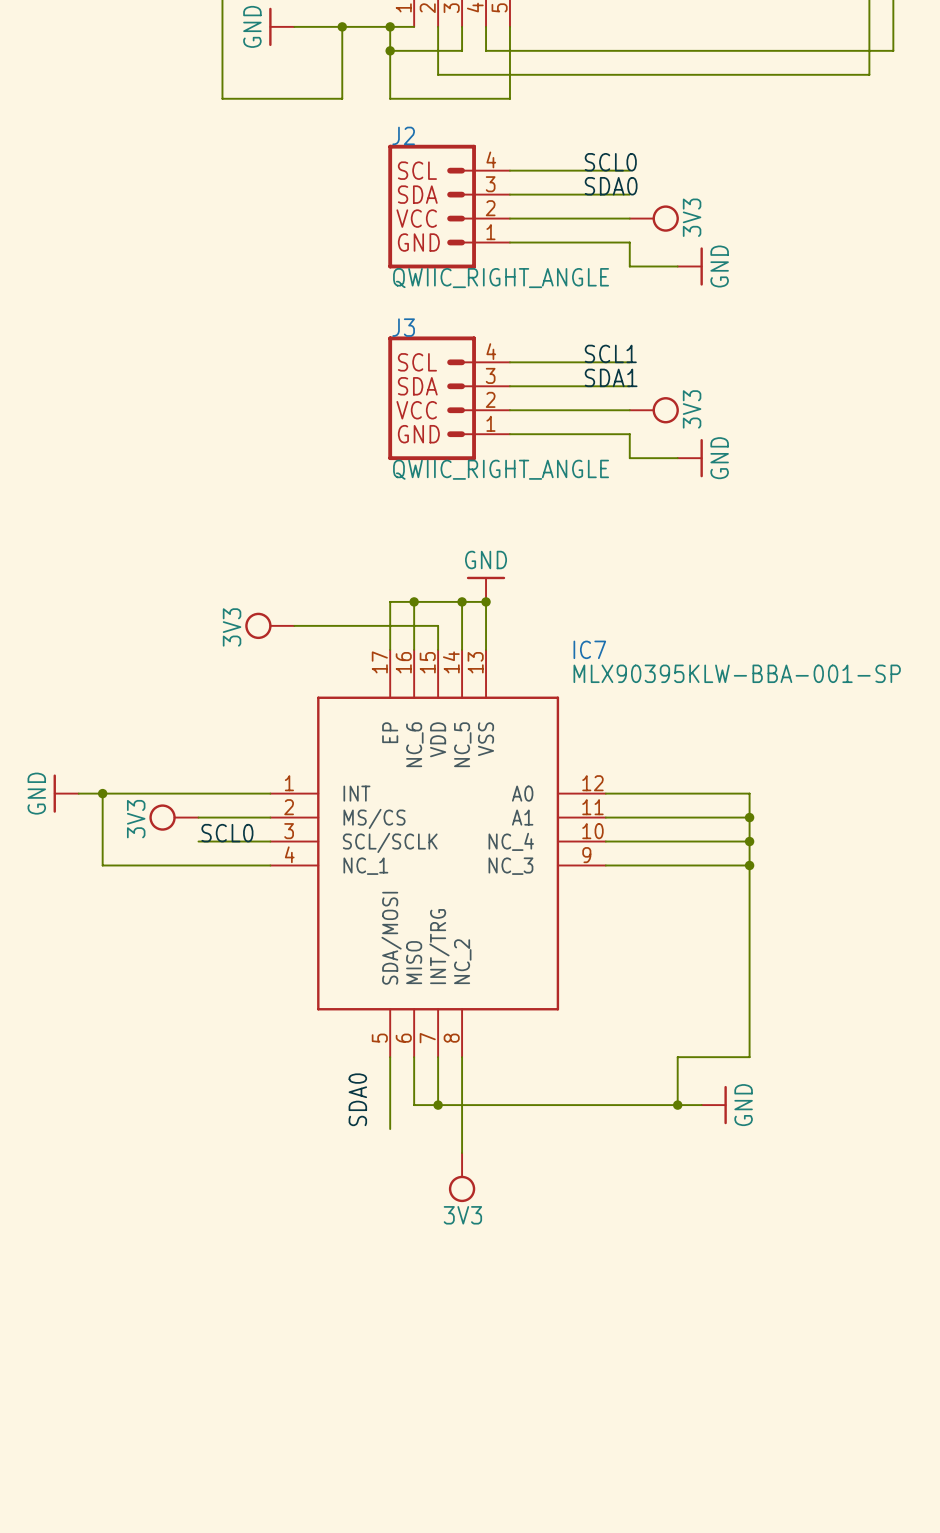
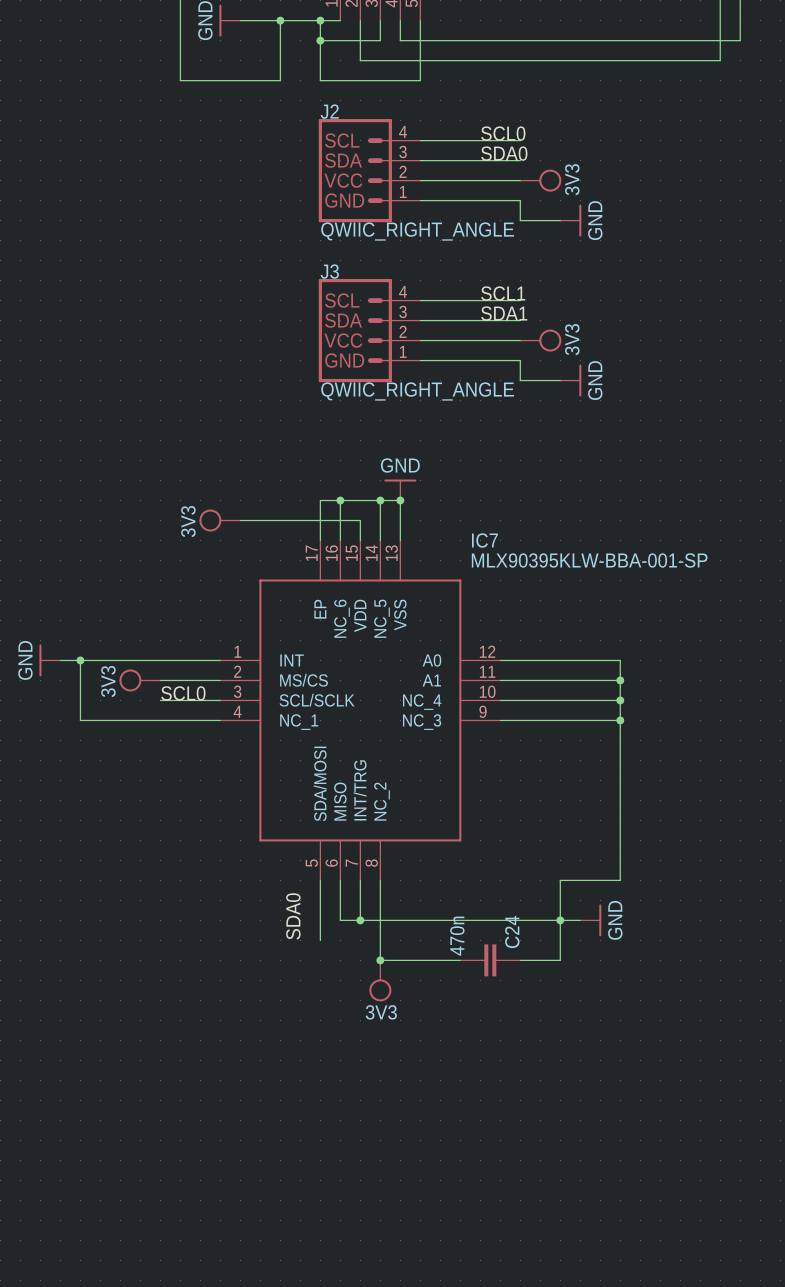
wire: none -> (560, 920) (560, 960) (520, 960)
wire: none -> (380, 960) (460, 960)
junction: none -> (380, 960)
C24: none -> 470n (490, 960)

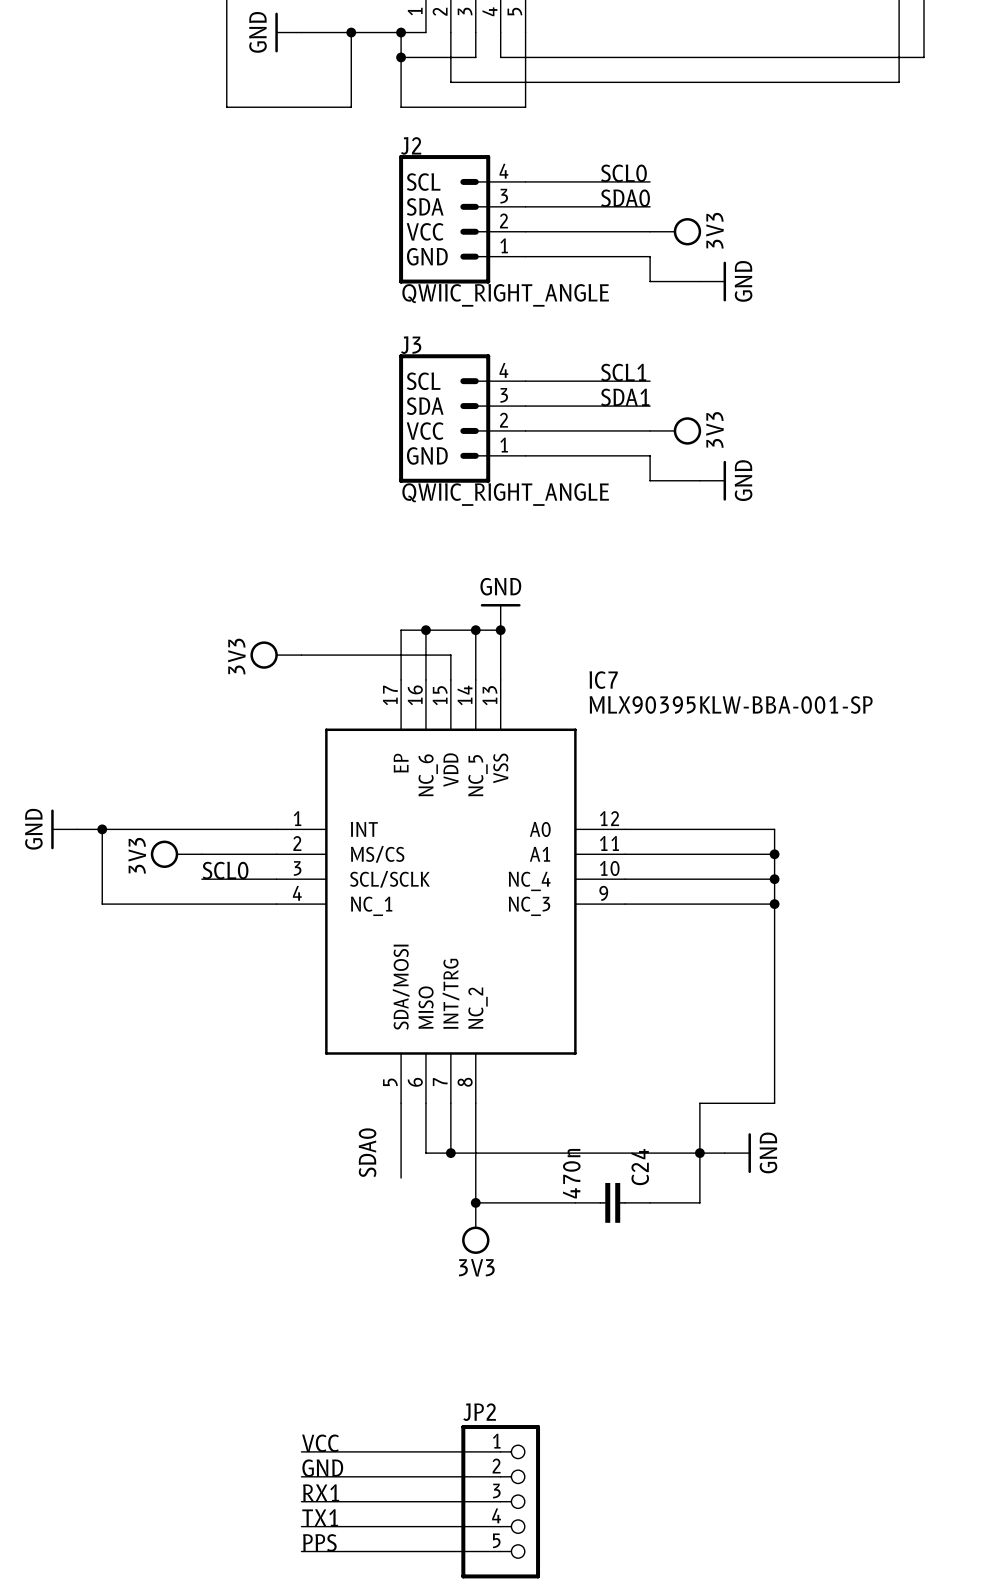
label: none -> VCC (320, 1443)
wire: none -> (301, 1451) (500, 1451)
label: none -> GND (322, 1468)
wire: none -> (301, 1476) (500, 1476)
label: none -> RX1 (321, 1493)
wire: none -> (301, 1501) (500, 1501)
JP2: none -> (500, 1501)
label: none -> TX1 (320, 1517)
wire: none -> (301, 1526) (500, 1526)
label: none -> PPS (319, 1542)
wire: none -> (301, 1551) (500, 1551)

